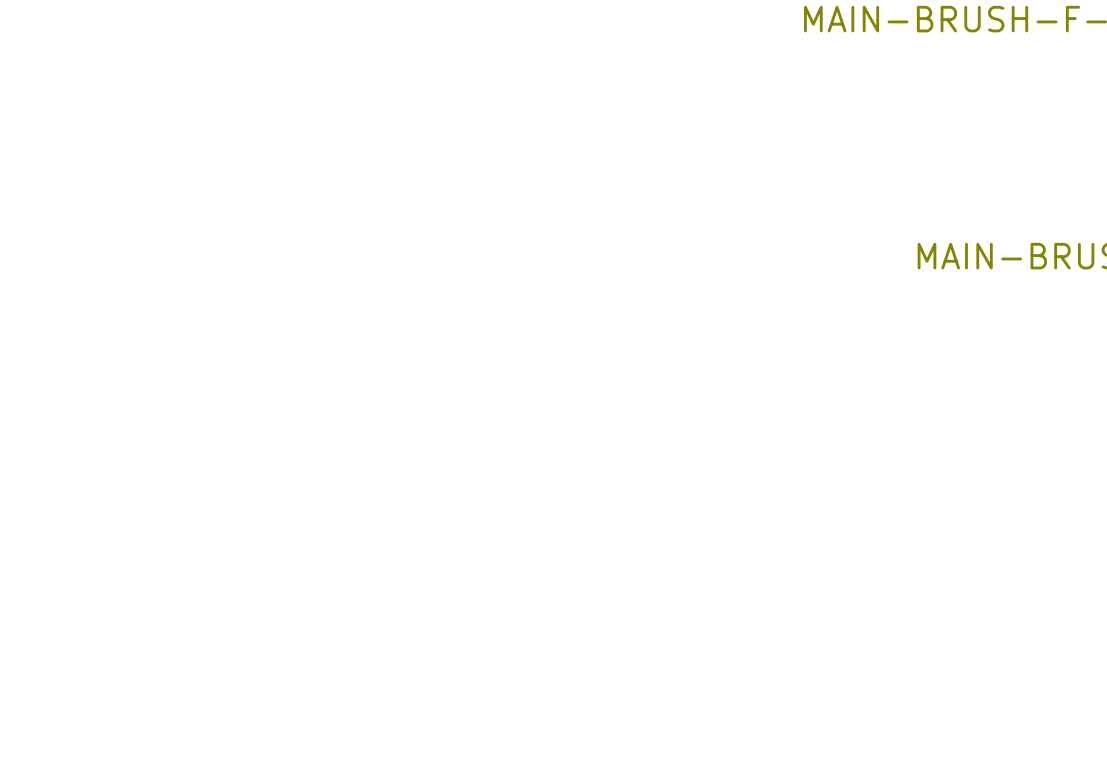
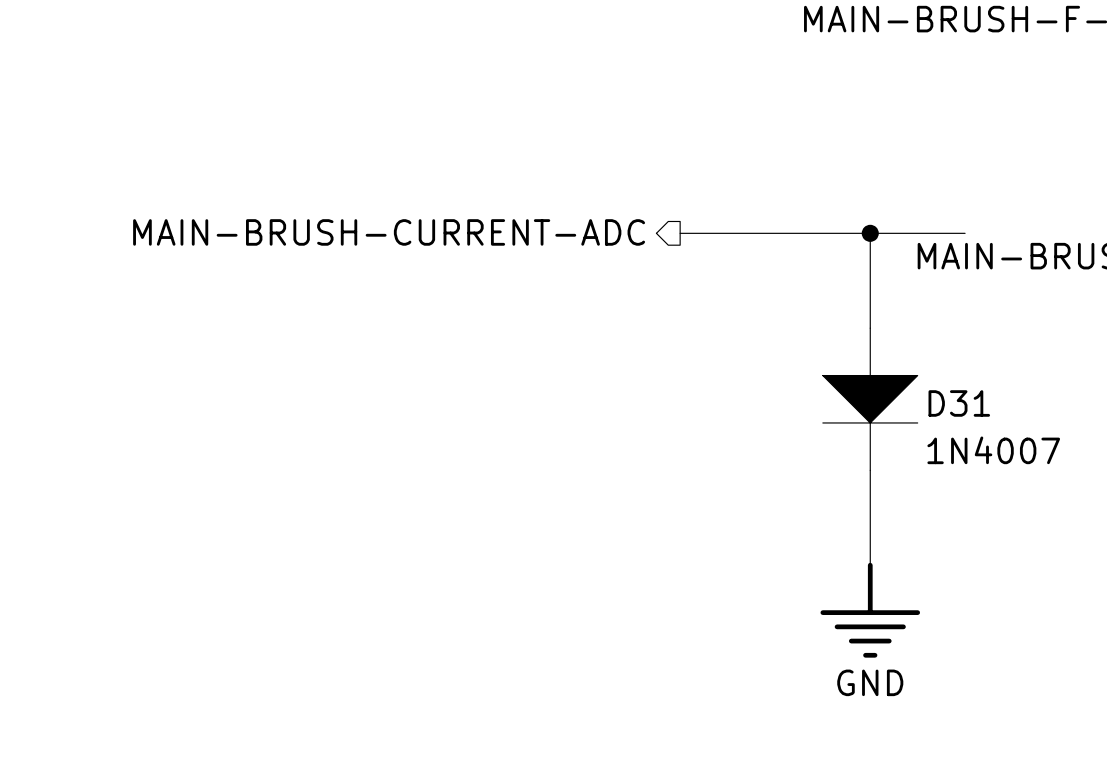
hierarchical label: none -> MAIN-BRUSH-CURRENT-ADC (389, 232)
wire: none -> (680, 233) (965, 233)
wire: none -> (870, 233) (870, 328)
junction: none -> (870, 233)
D31: none -> 1N4007 (870, 399)
wire: none -> (870, 470) (870, 565)
power symbol: none -> GND (870, 610)

